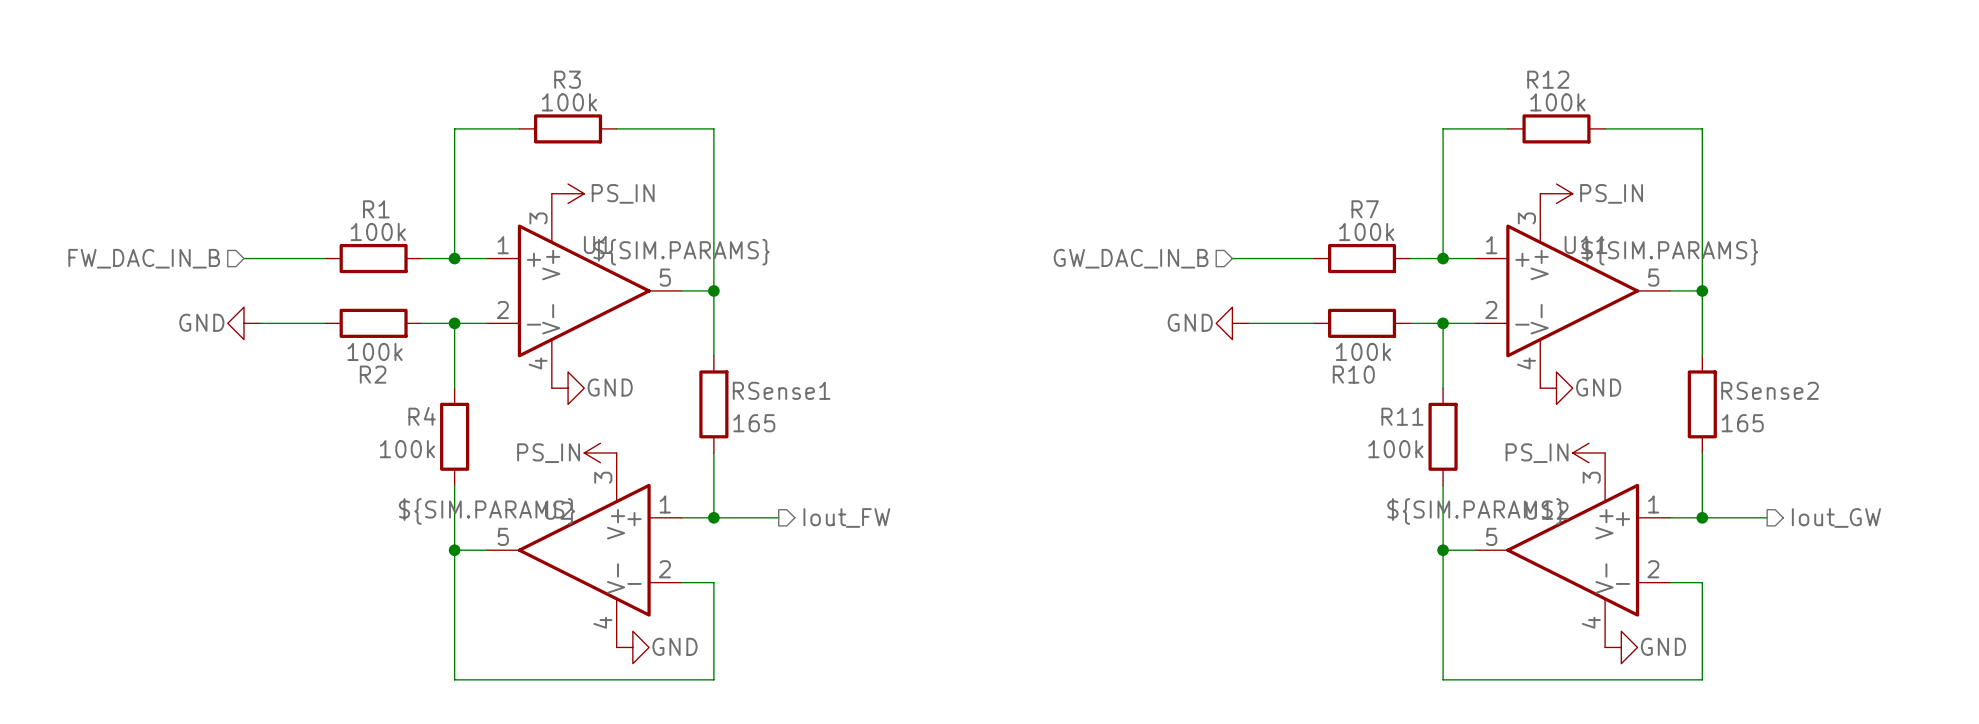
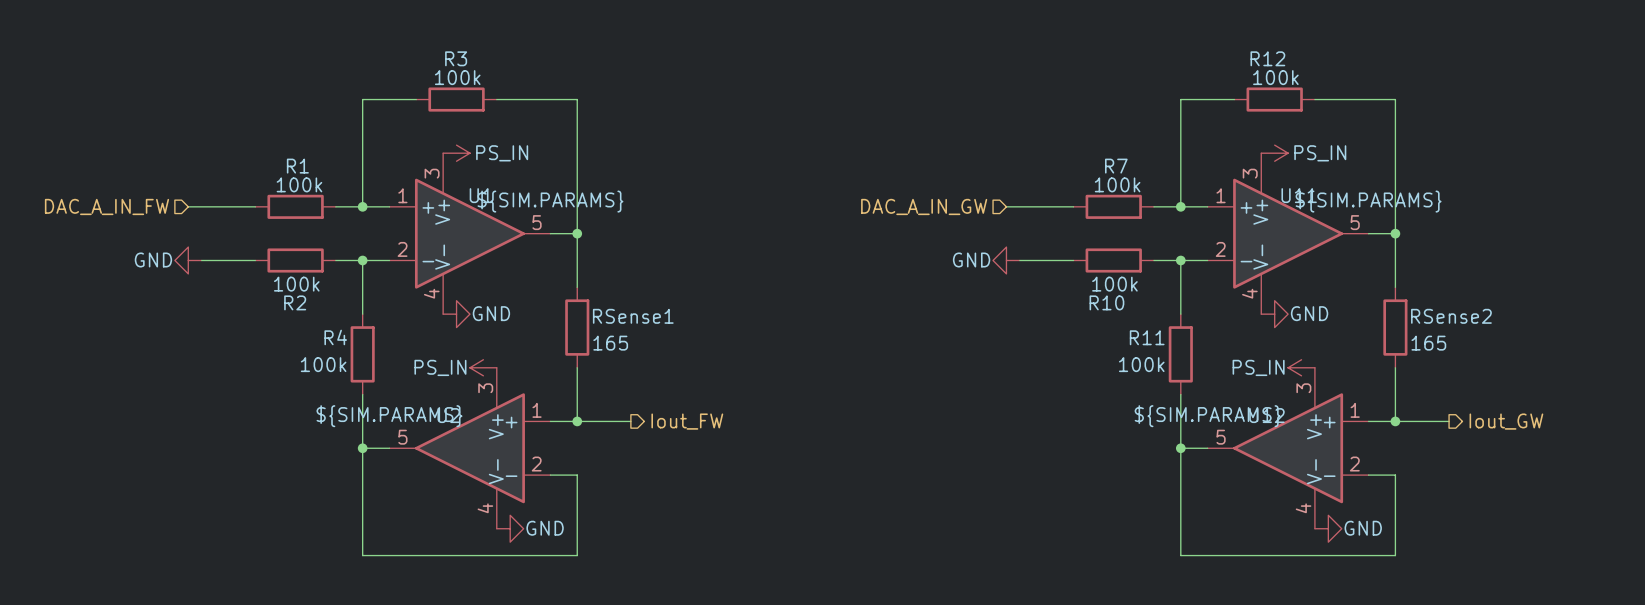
hierarchical label: FW_DAC_IN_B (144, 258) -> DAC_A_IN_FW (106, 206)
hierarchical label: GW_DAC_IN_B (1131, 258) -> DAC_A_IN_GW (924, 206)

